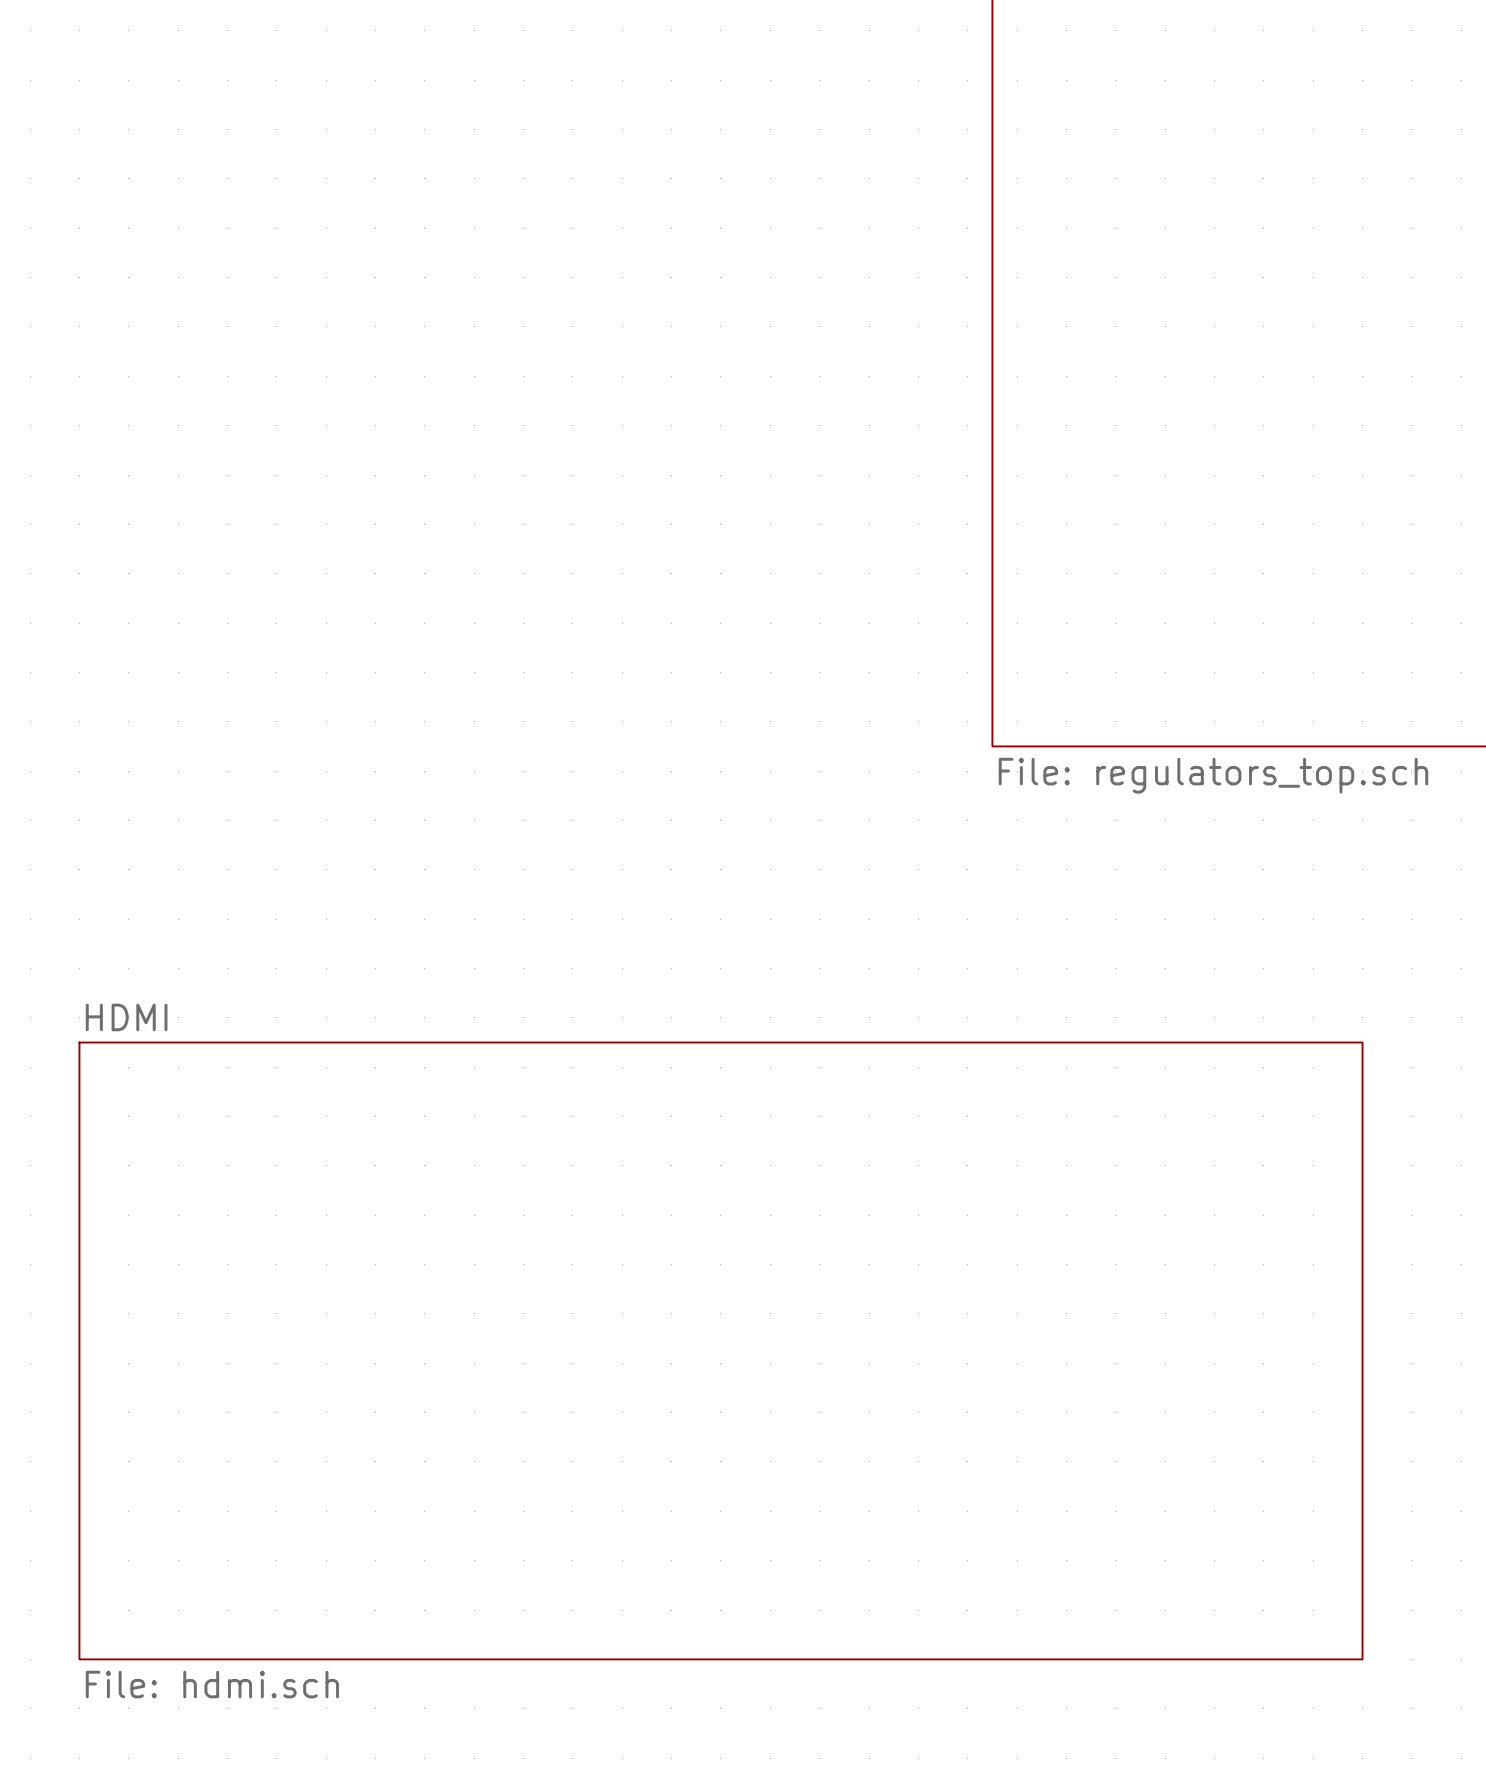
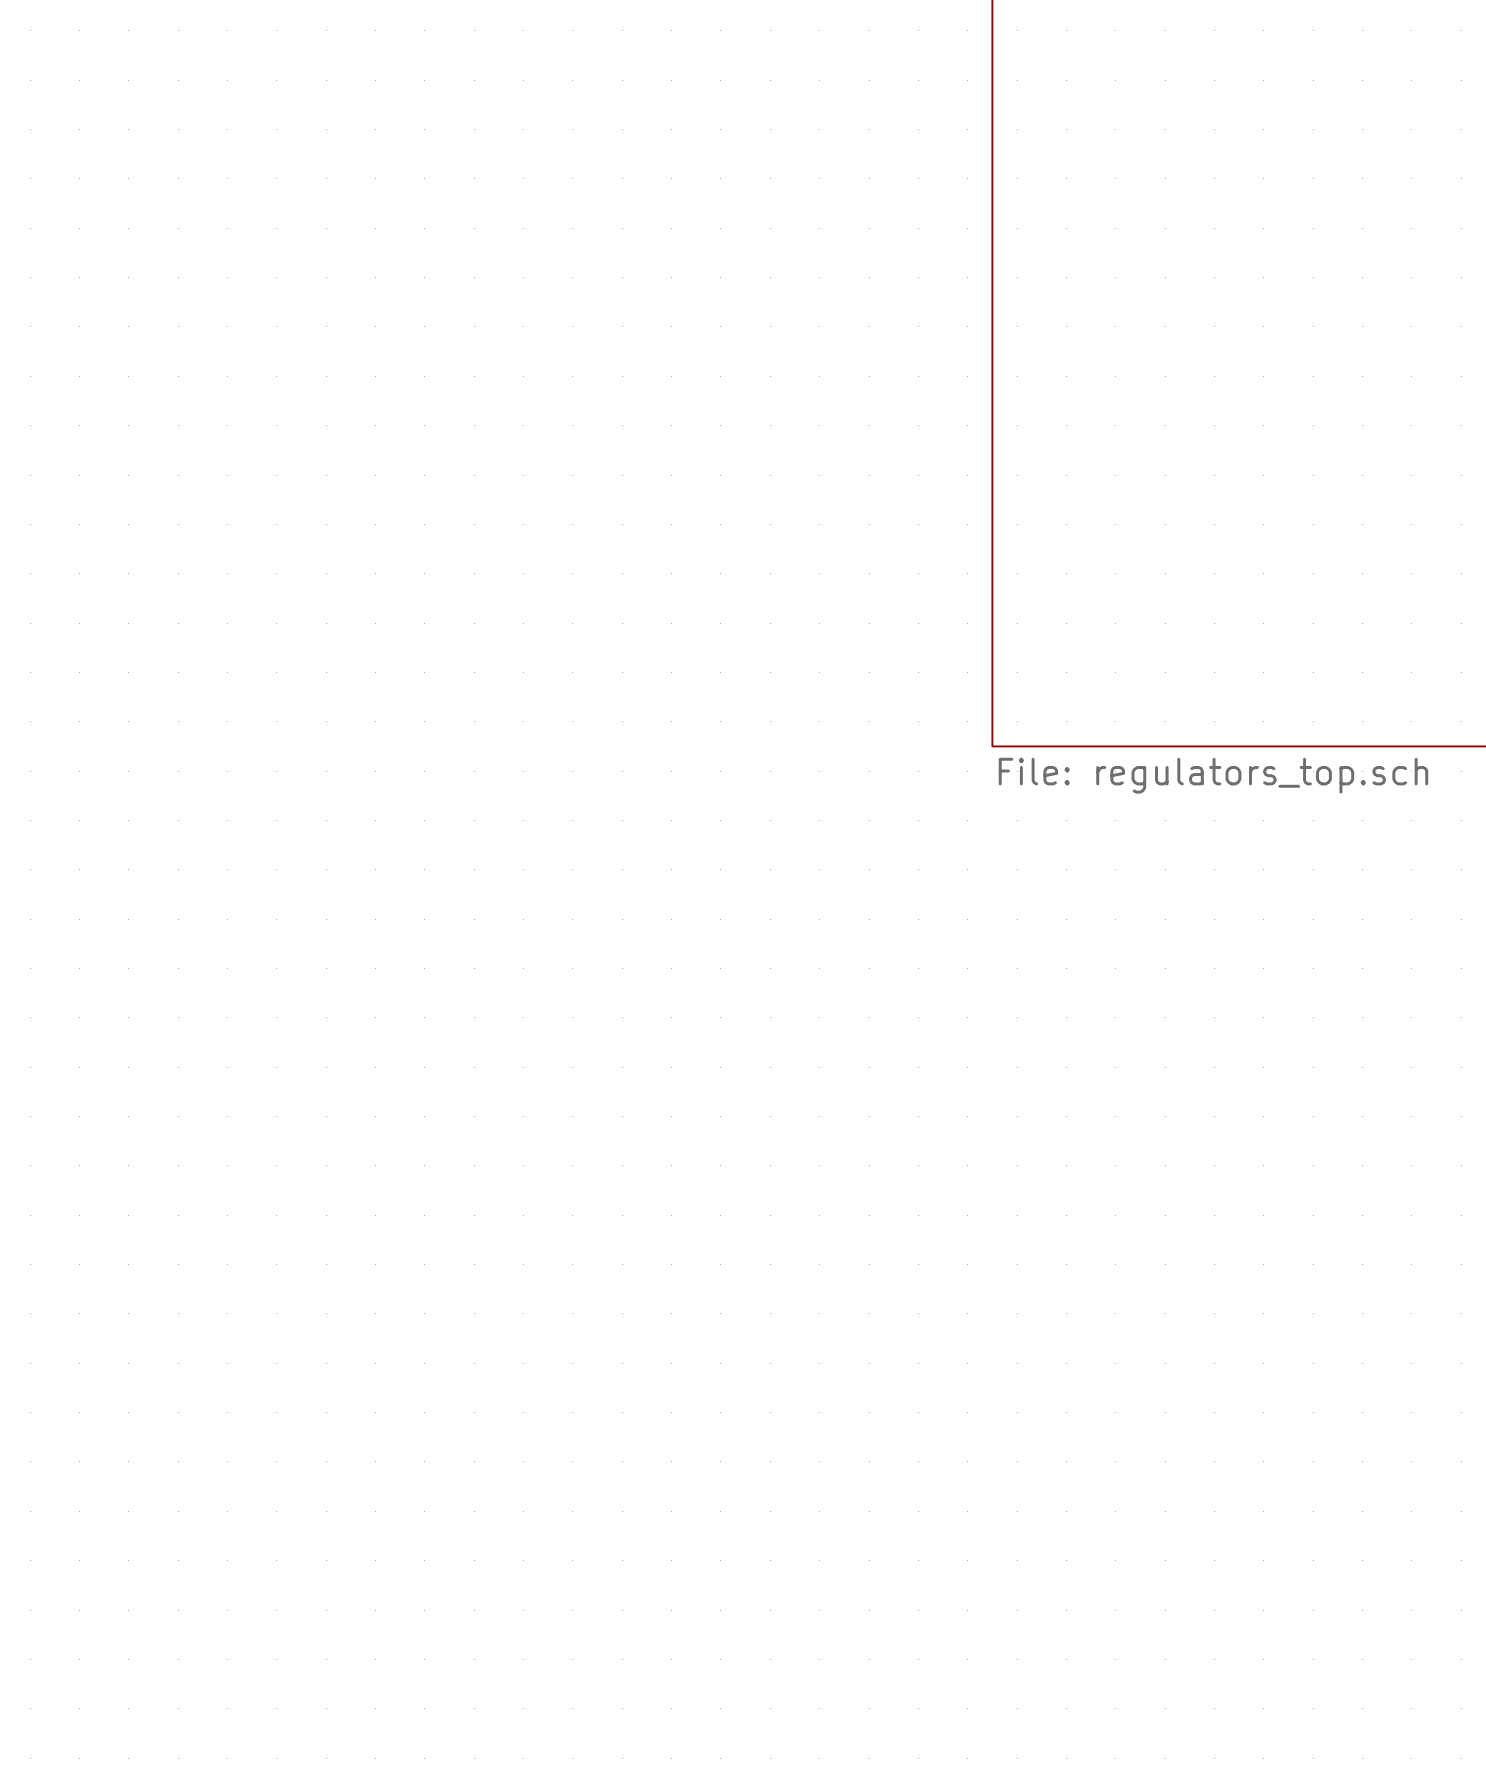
sheet HDMI: File: hdmi.sch (720, 1350) -> none

